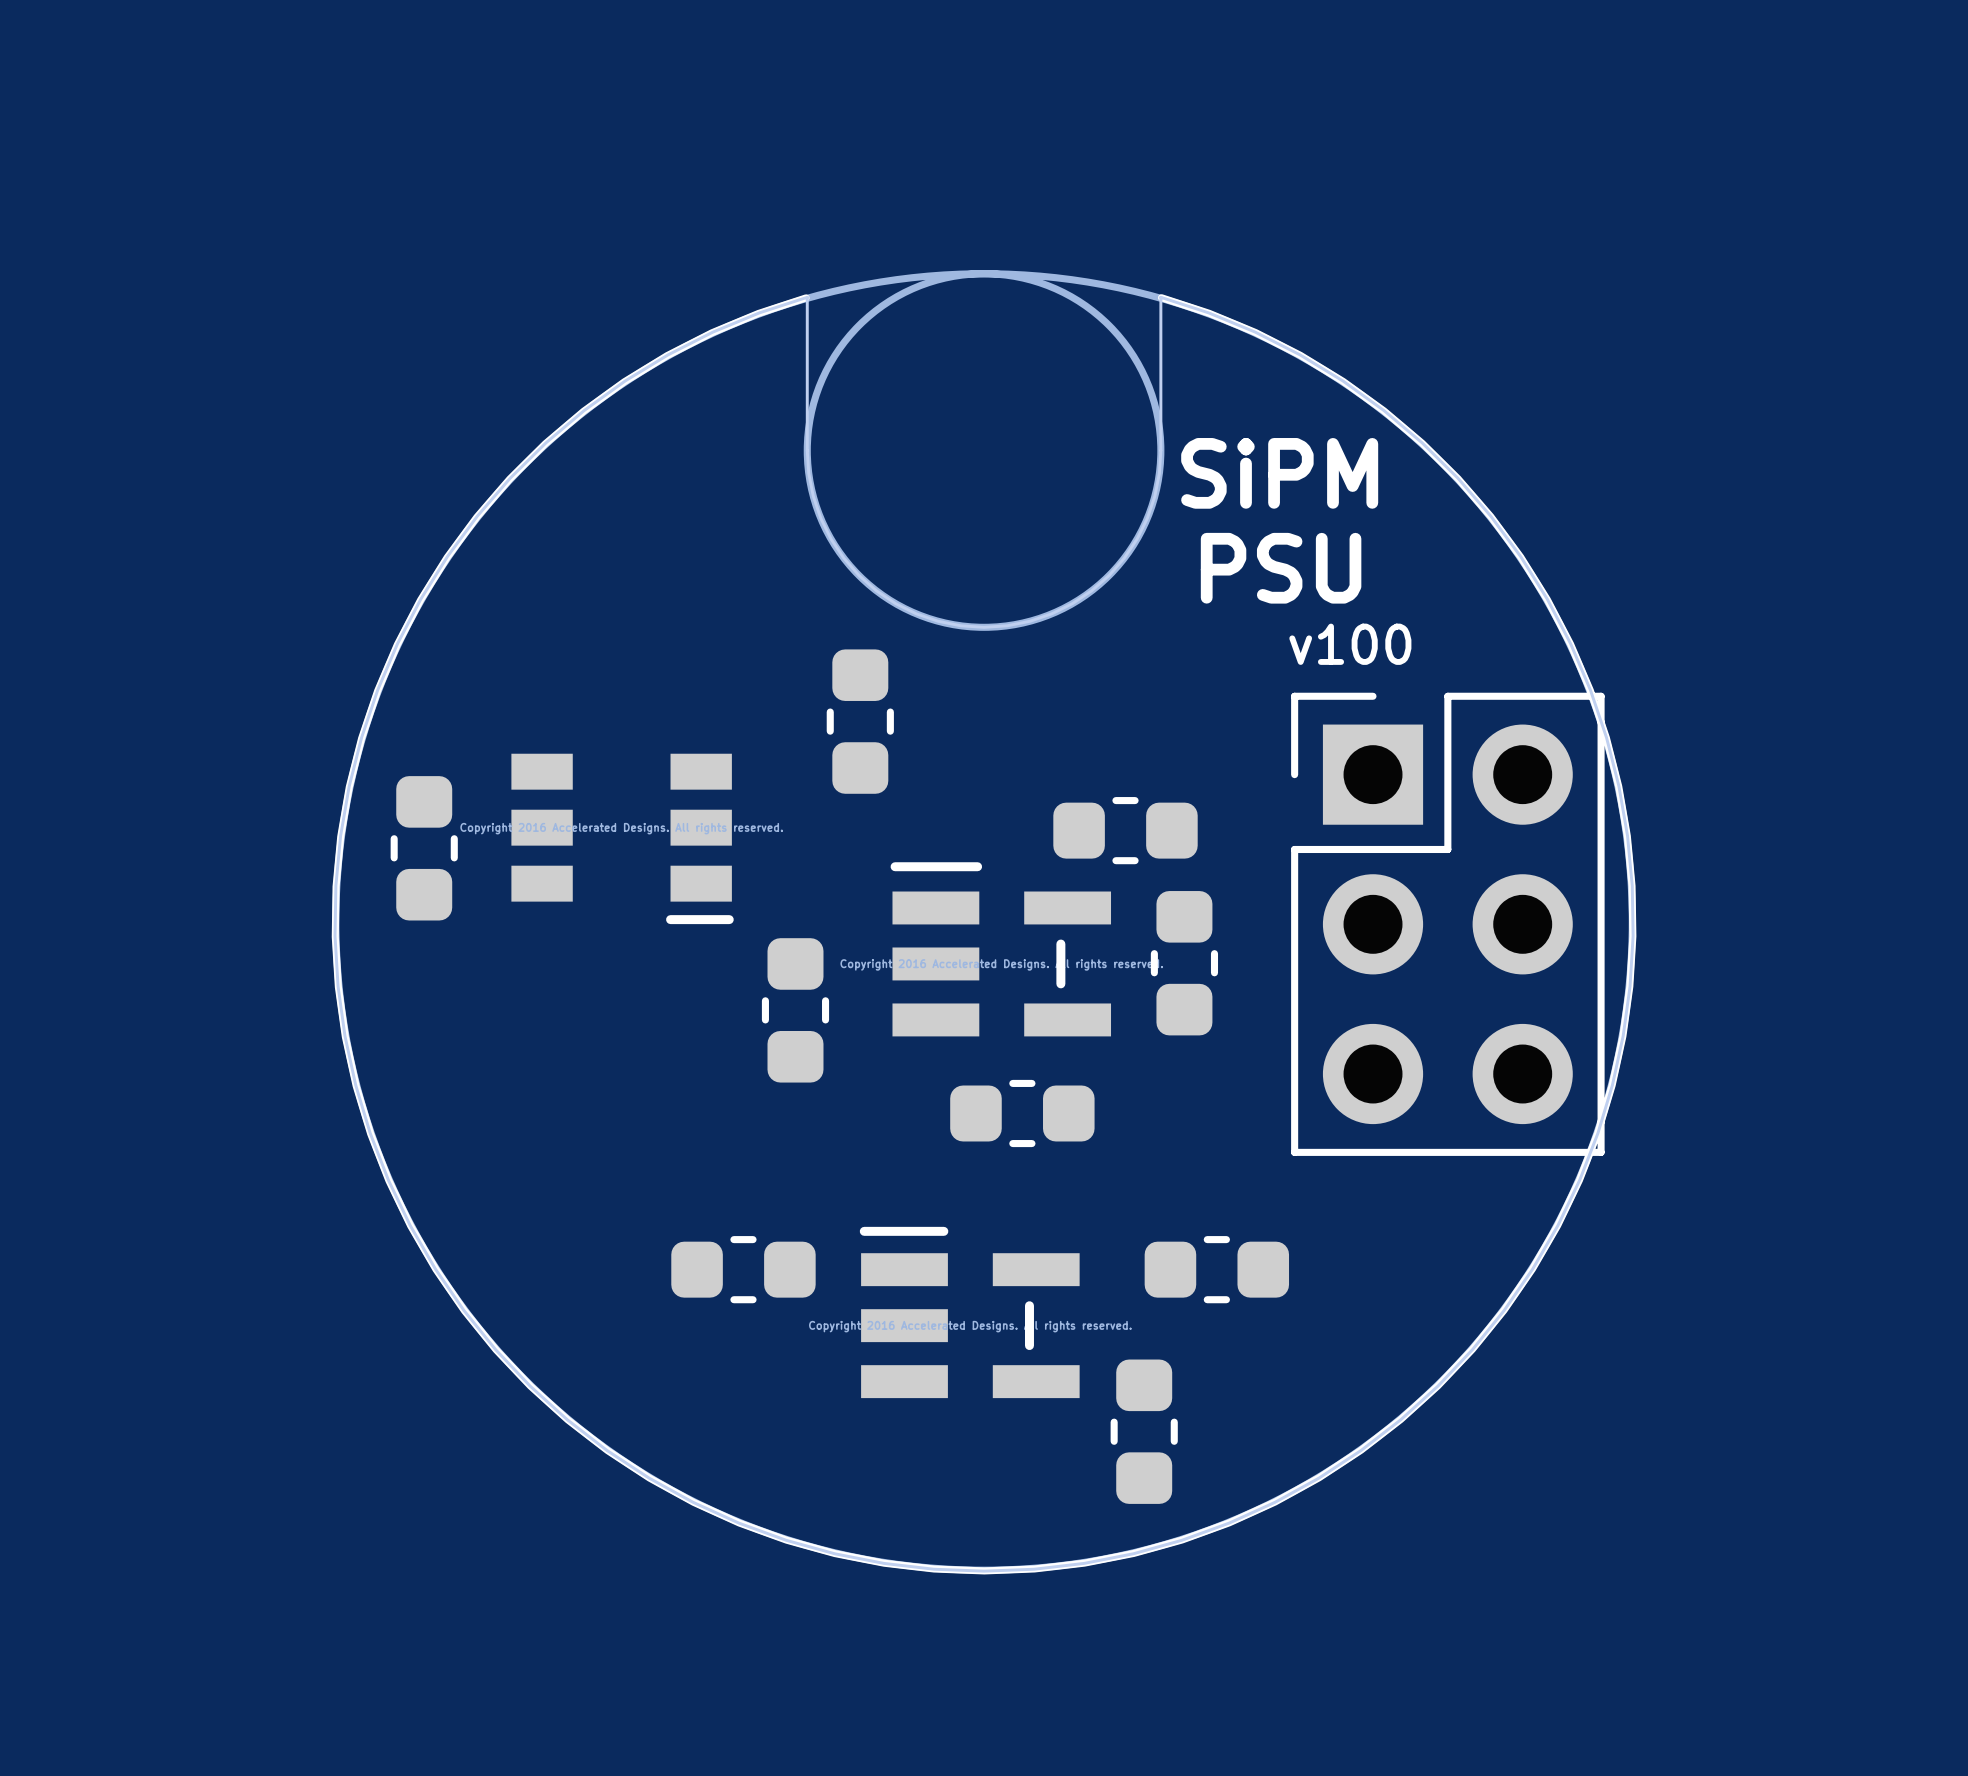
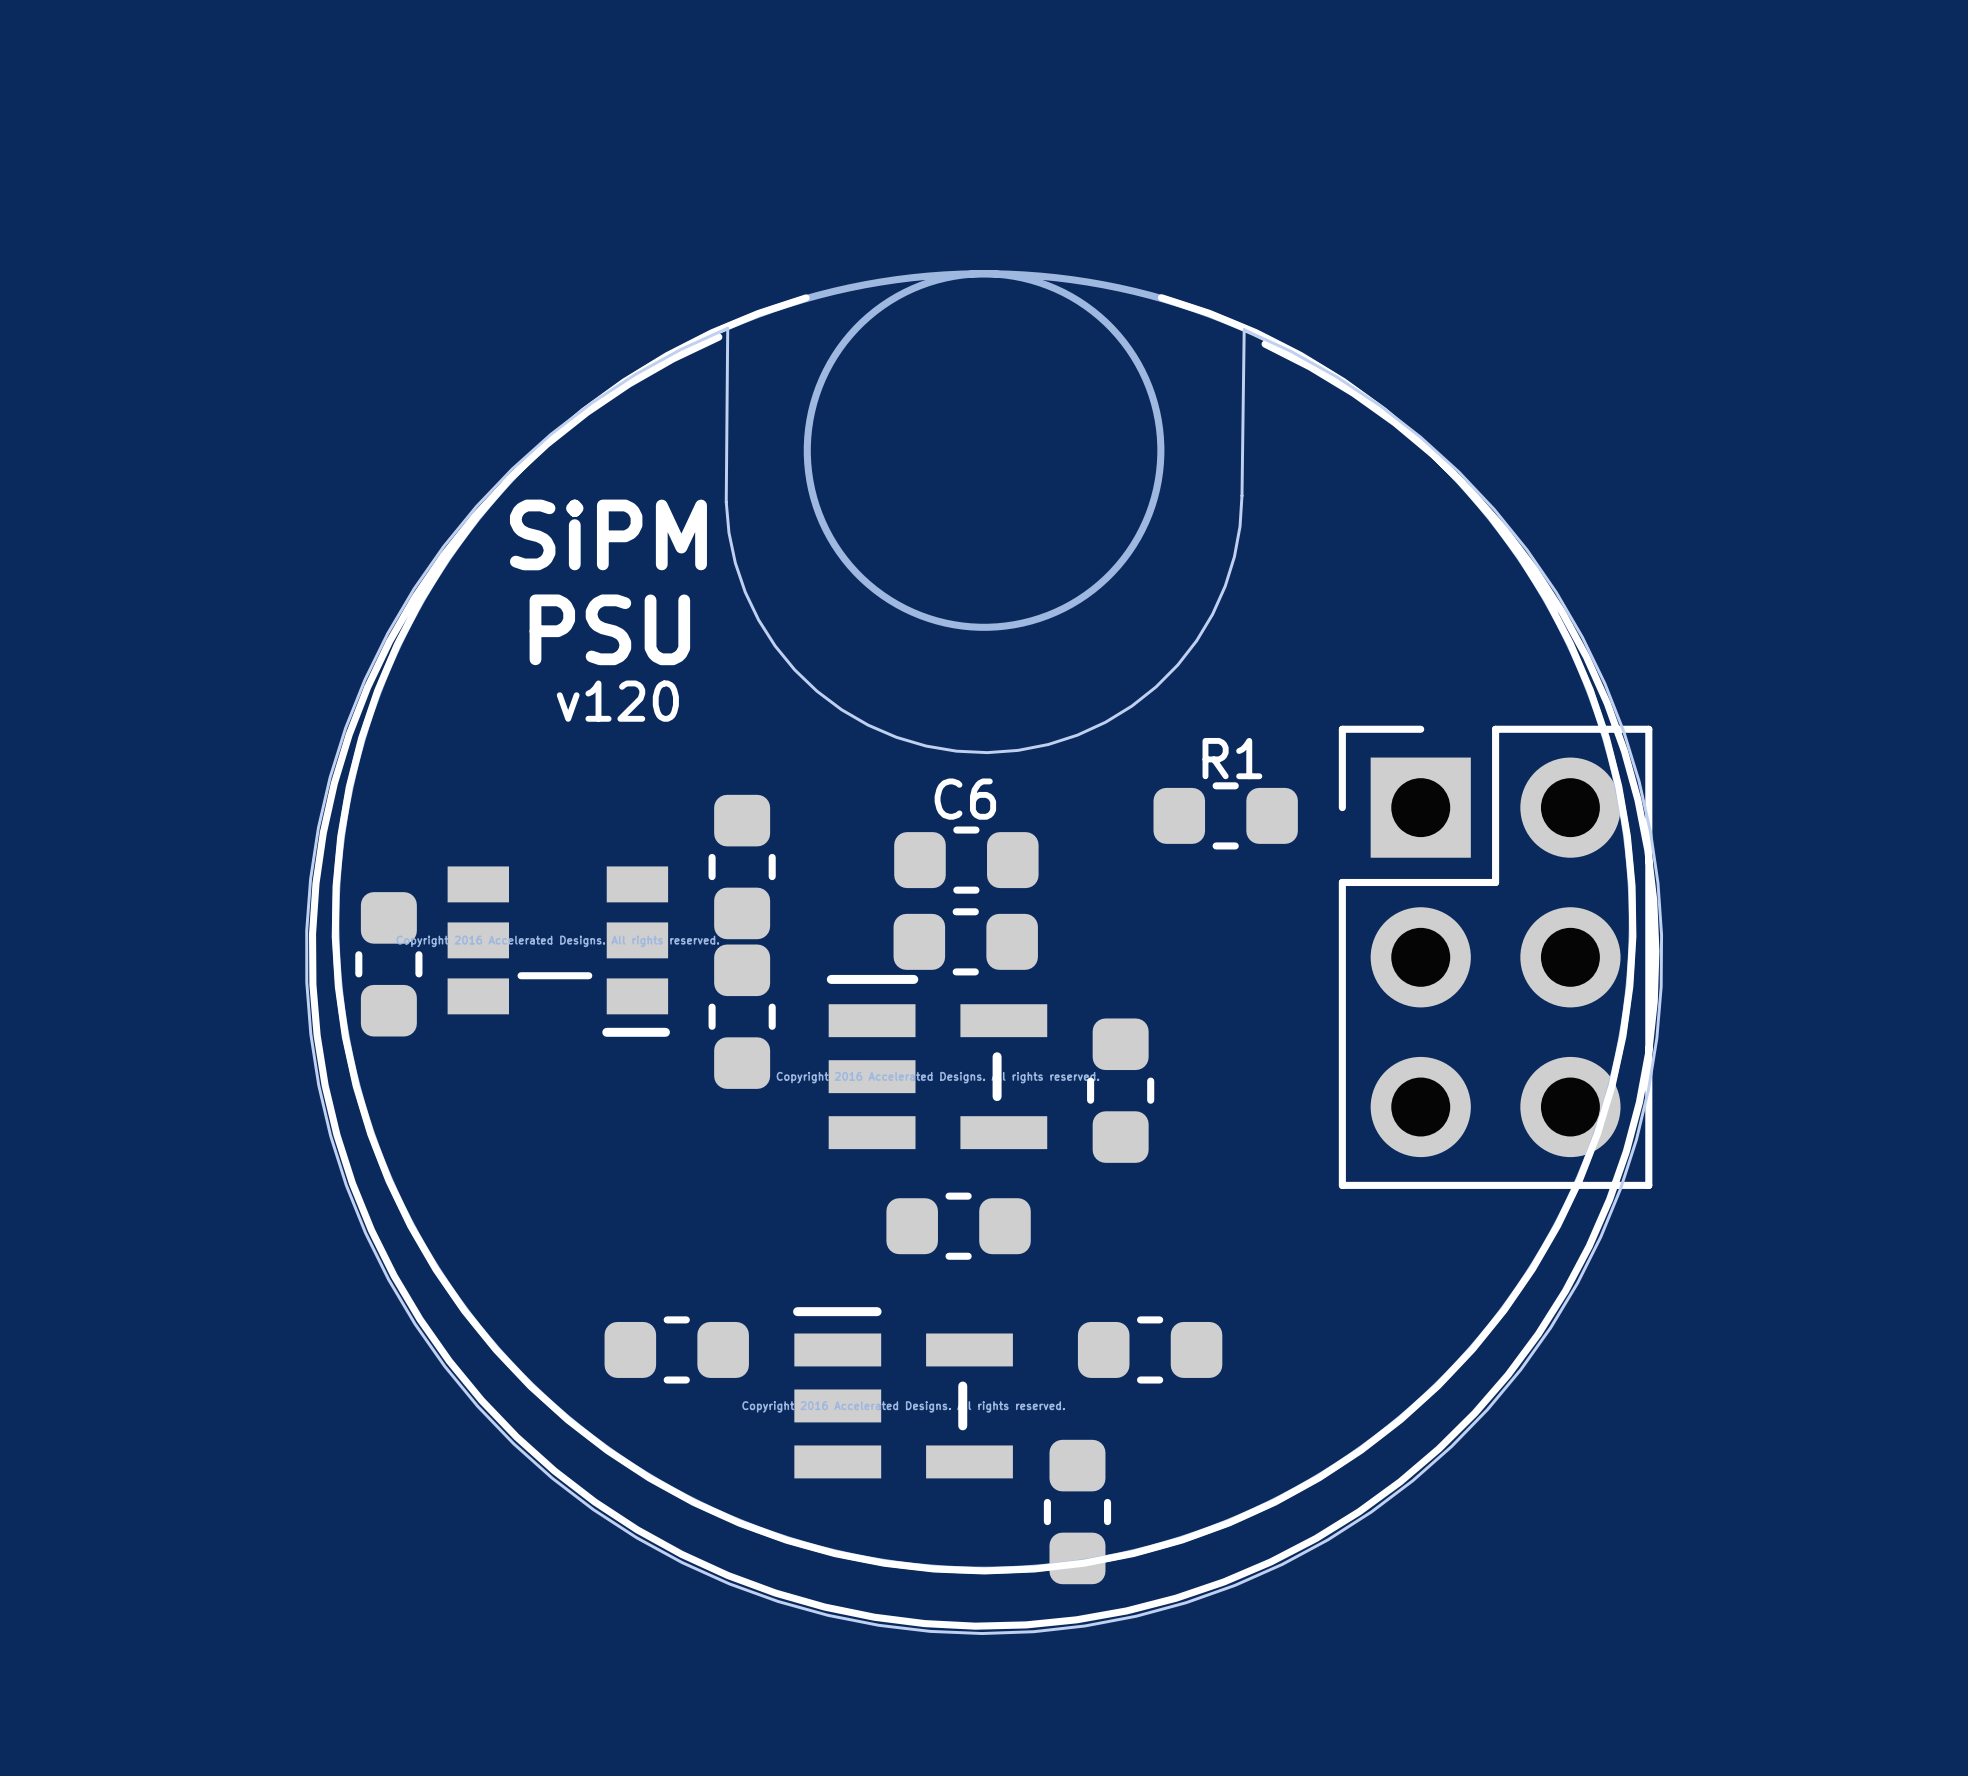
board edge: (807, 297) (807, 450) (808, 473) (813, 496) (820, 518) (830, 538) (843, 558) (859, 575) (876, 590) (895, 603) (916, 613) (938, 621) (960, 625) (984, 627) (1007, 625) (1029, 621) (1051, 613) (1072, 603) (1091, 590) (1109, 575) (1124, 558) (1137, 538) (1147, 518) (1154, 496) (1159, 473) (1160, 297) (1208, 312) (1255, 332) (1299, 354) (1342, 380) (1383, 410) (1422, 442) (1457, 478) (1490, 516) (1520, 556) (1547, 599) (1570, 643) (1590, 689) (1606, 737) (1618, 786) (1627, 835) (1632, 885) (1633, 936) (1630, 986) (1623, 1036) (1612, 1085) (1597, 1133) (1579, 1180) (1557, 1225) (1532, 1268) (1504, 1310) (1472, 1349) (1438, 1385) (1400, 1419) (1361, 1450) (1319, 1478) (1275, 1502) (1229, 1523) (1182, 1540) (1133, 1553) (1084, 1563) (1034, 1569) (984, 1571) (933, 1569) (883, 1563) (834, 1553) (786, 1540) (738, 1523) (693, 1502) (649, 1478) (607, 1450) (567, 1419) (530, 1385) (495, 1349) (463, 1310) (435, 1268) (410, 1225) (388, 1180) (370, 1133) (355, 1085) (344, 1036) (338, 986) (335, 936) (335, 885) (340, 835) (349, 786) (361, 737) (377, 689) (397, 643) (420, 599) (447, 556) (477, 516) (510, 478) (546, 442) (584, 410) (625, 380) (668, 354) (713, 332) (759, 312) (807, 297) -> (727, 328) (680, 349) (635, 374) (591, 402) (550, 434) (512, 469) (476, 506) (443, 546) (414, 588) (387, 633) (364, 680) (345, 728) (330, 777) (318, 827) (310, 879) (306, 930) (306, 982) (310, 1034) (318, 1085) (330, 1135) (346, 1185) (365, 1233) (388, 1279) (415, 1324) (444, 1366) (477, 1406) (513, 1443) (552, 1478) (593, 1509) (636, 1537) (682, 1562) (729, 1583) (778, 1601) (828, 1615) (878, 1625) (930, 1631) (982, 1633) (1033, 1631) (1085, 1625) (1136, 1616) (1186, 1602) (1234, 1585) (1282, 1564) (1327, 1539) (1371, 1511) (1412, 1480) (1451, 1446) (1487, 1409) (1520, 1369) (1550, 1327) (1577, 1283) (1600, 1236) (1620, 1188) (1636, 1139) (1648, 1089) (1656, 1038) (1661, 986) (1661, 934) (1657, 883) (1650, 831) (1639, 781) (1623, 731) (1604, 683) (1582, 637) (1556, 592) (1526, 549) (1494, 509) (1458, 471) (1420, 437) (1379, 405) (1336, 376) (1291, 351) (1244, 329) (1241, 495) (1240, 526) (1234, 556) (1225, 586) (1212, 614) (1196, 640) (1177, 665) (1156, 686) (1131, 706) (1105, 722) (1077, 735) (1048, 744) (1018, 750) (987, 752) (956, 751) (926, 746) (896, 737) (868, 725) (841, 709) (816, 691) (794, 669) (775, 645) (758, 619) (745, 592) (735, 562) (728, 532) (726, 502) (727, 328)
line: none -> (718, 337) (672, 358) (628, 384) (586, 412) (547, 444) (509, 478) (475, 515) (443, 555) (414, 597) (389, 641) (367, 687) (349, 734) (334, 783) (323, 832) (316, 883) (312, 933) (312, 984) (317, 1035) (325, 1085) (336, 1134) (352, 1183) (371, 1230) (394, 1275) (420, 1319) (449, 1361) (481, 1400) (516, 1437) (554, 1470) (594, 1501) (637, 1529) (681, 1554) (727, 1575) (775, 1593) (824, 1607) (874, 1617) (924, 1623) (975, 1626) (1026, 1624) (1076, 1619) (1126, 1610) (1175, 1598) (1224, 1581) (1270, 1561) (1315, 1538) (1359, 1511) (1400, 1481) (1438, 1448) (1474, 1413) (1508, 1374) (1538, 1333) (1565, 1290) (1589, 1246) (1609, 1199) (1626, 1151) (1639, 1102) (1648, 1052) (1654, 1001) (1655, 951) (1653, 900) (1647, 849) (1637, 800) (1624, 751) (1607, 703) (1586, 656) (1562, 612) (1534, 569) (1504, 529) (1470, 490) (1434, 455) (1395, 422) (1353, 393) (1310, 367) (1265, 344)
text position: SiPM (1279, 473) -> SiPM (608, 534)
text position: PSU (1281, 568) -> PSU (609, 629)
text: v100 (1350, 644) -> none
text: none -> v120 (617, 701)
part: (860, 721) -> none
R1: none -> (1225, 815)
part: (1125, 830) -> none
part position: (622, 838) -> (558, 951)
part position: (424, 848) -> (388, 964)
C6: none -> (966, 860)
part footprint: [890, 862, 1112, 1037] -> [893, 908, 1038, 976]
part: none -> (742, 867)
part position: (1447, 924) -> (1495, 957)
part: (1184, 963) -> none
line: none -> (521, 975) (588, 975)
part position: (795, 1010) -> (742, 1016)
part: none -> (937, 1062)
part: none -> (1120, 1090)
part: (1022, 1113) -> none
part: none -> (958, 1226)
part position: (743, 1269) -> (676, 1349)
part: (1216, 1269) -> none
part position: (969, 1312) -> (902, 1392)
part: none -> (1150, 1349)
part: (1144, 1431) -> none
part: none -> (1077, 1512)

